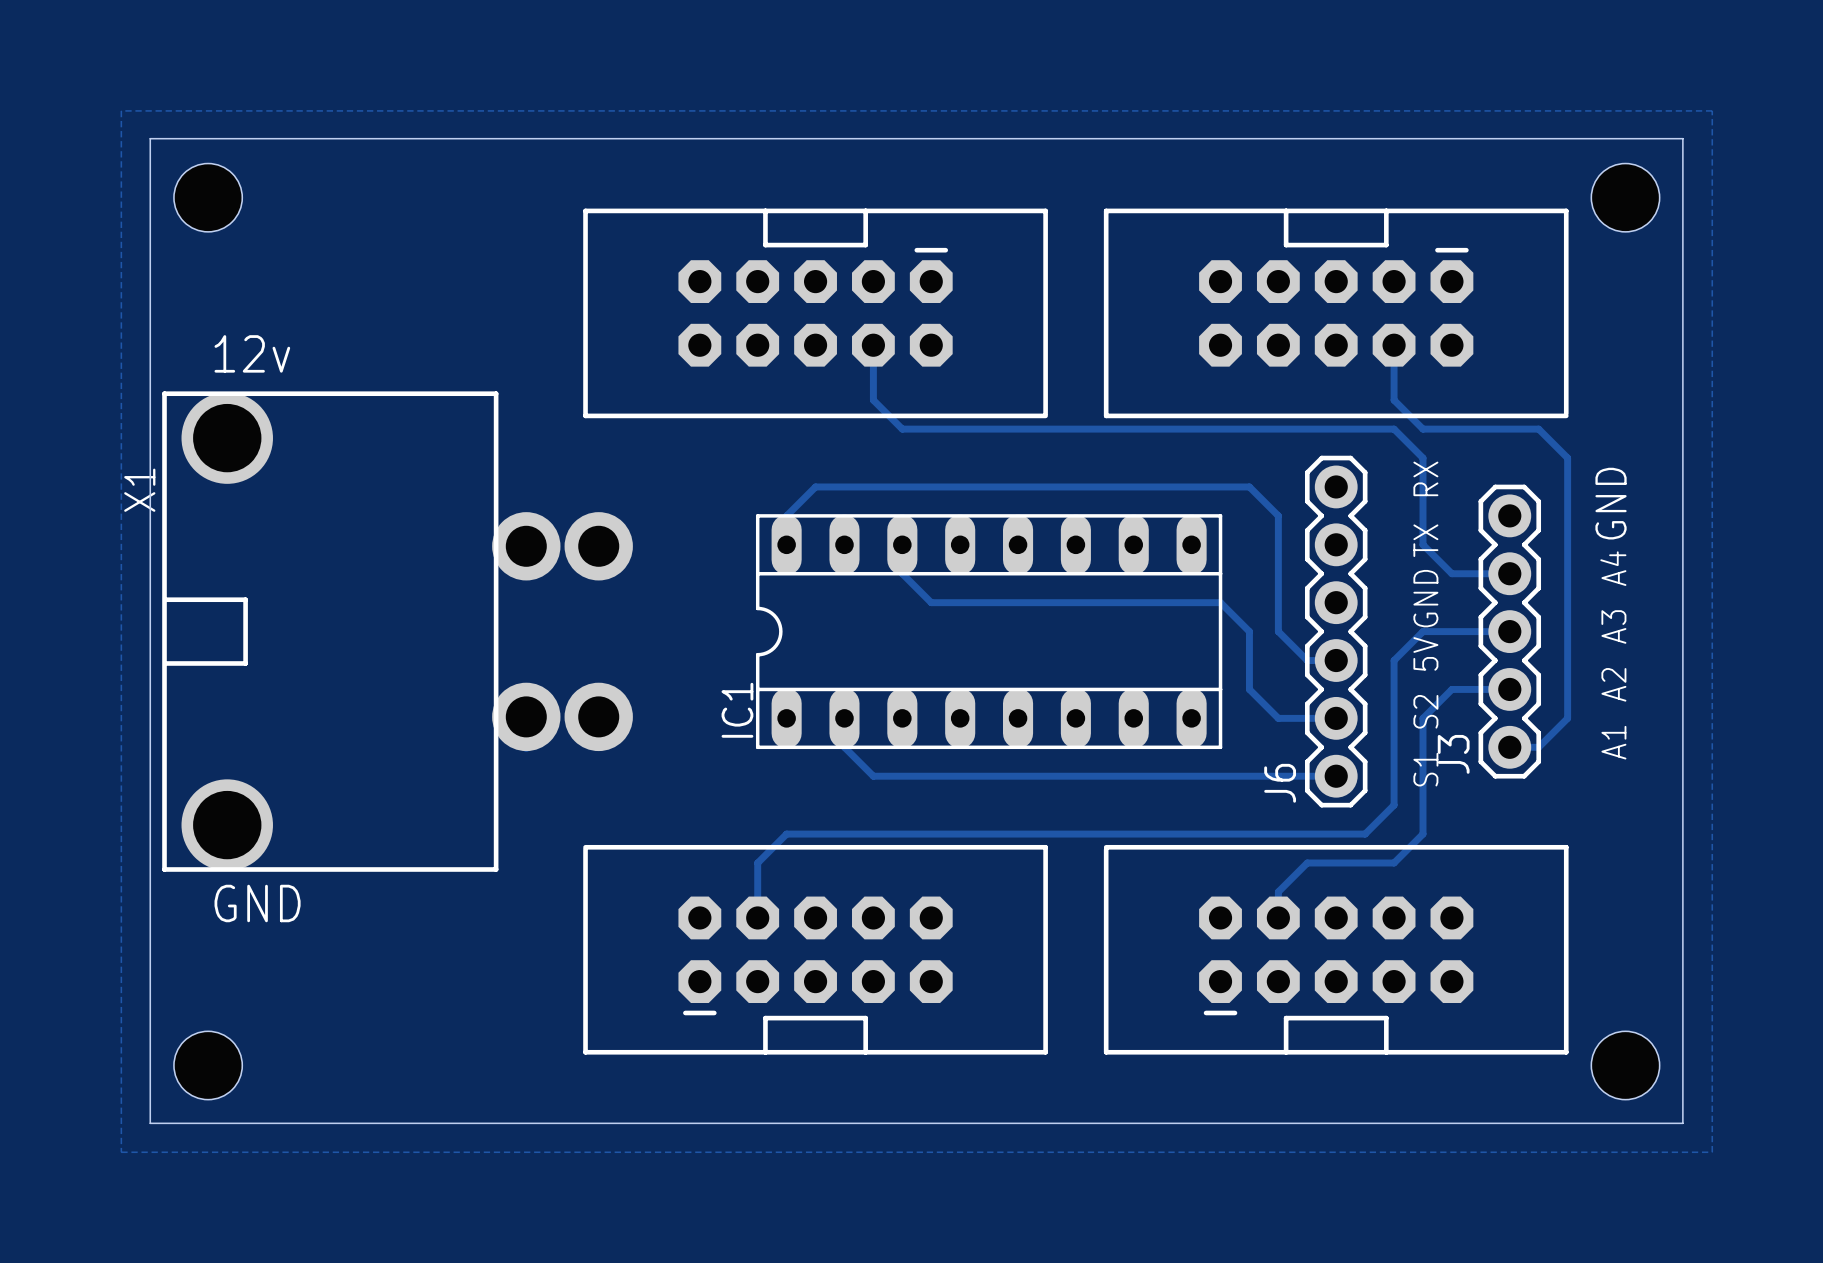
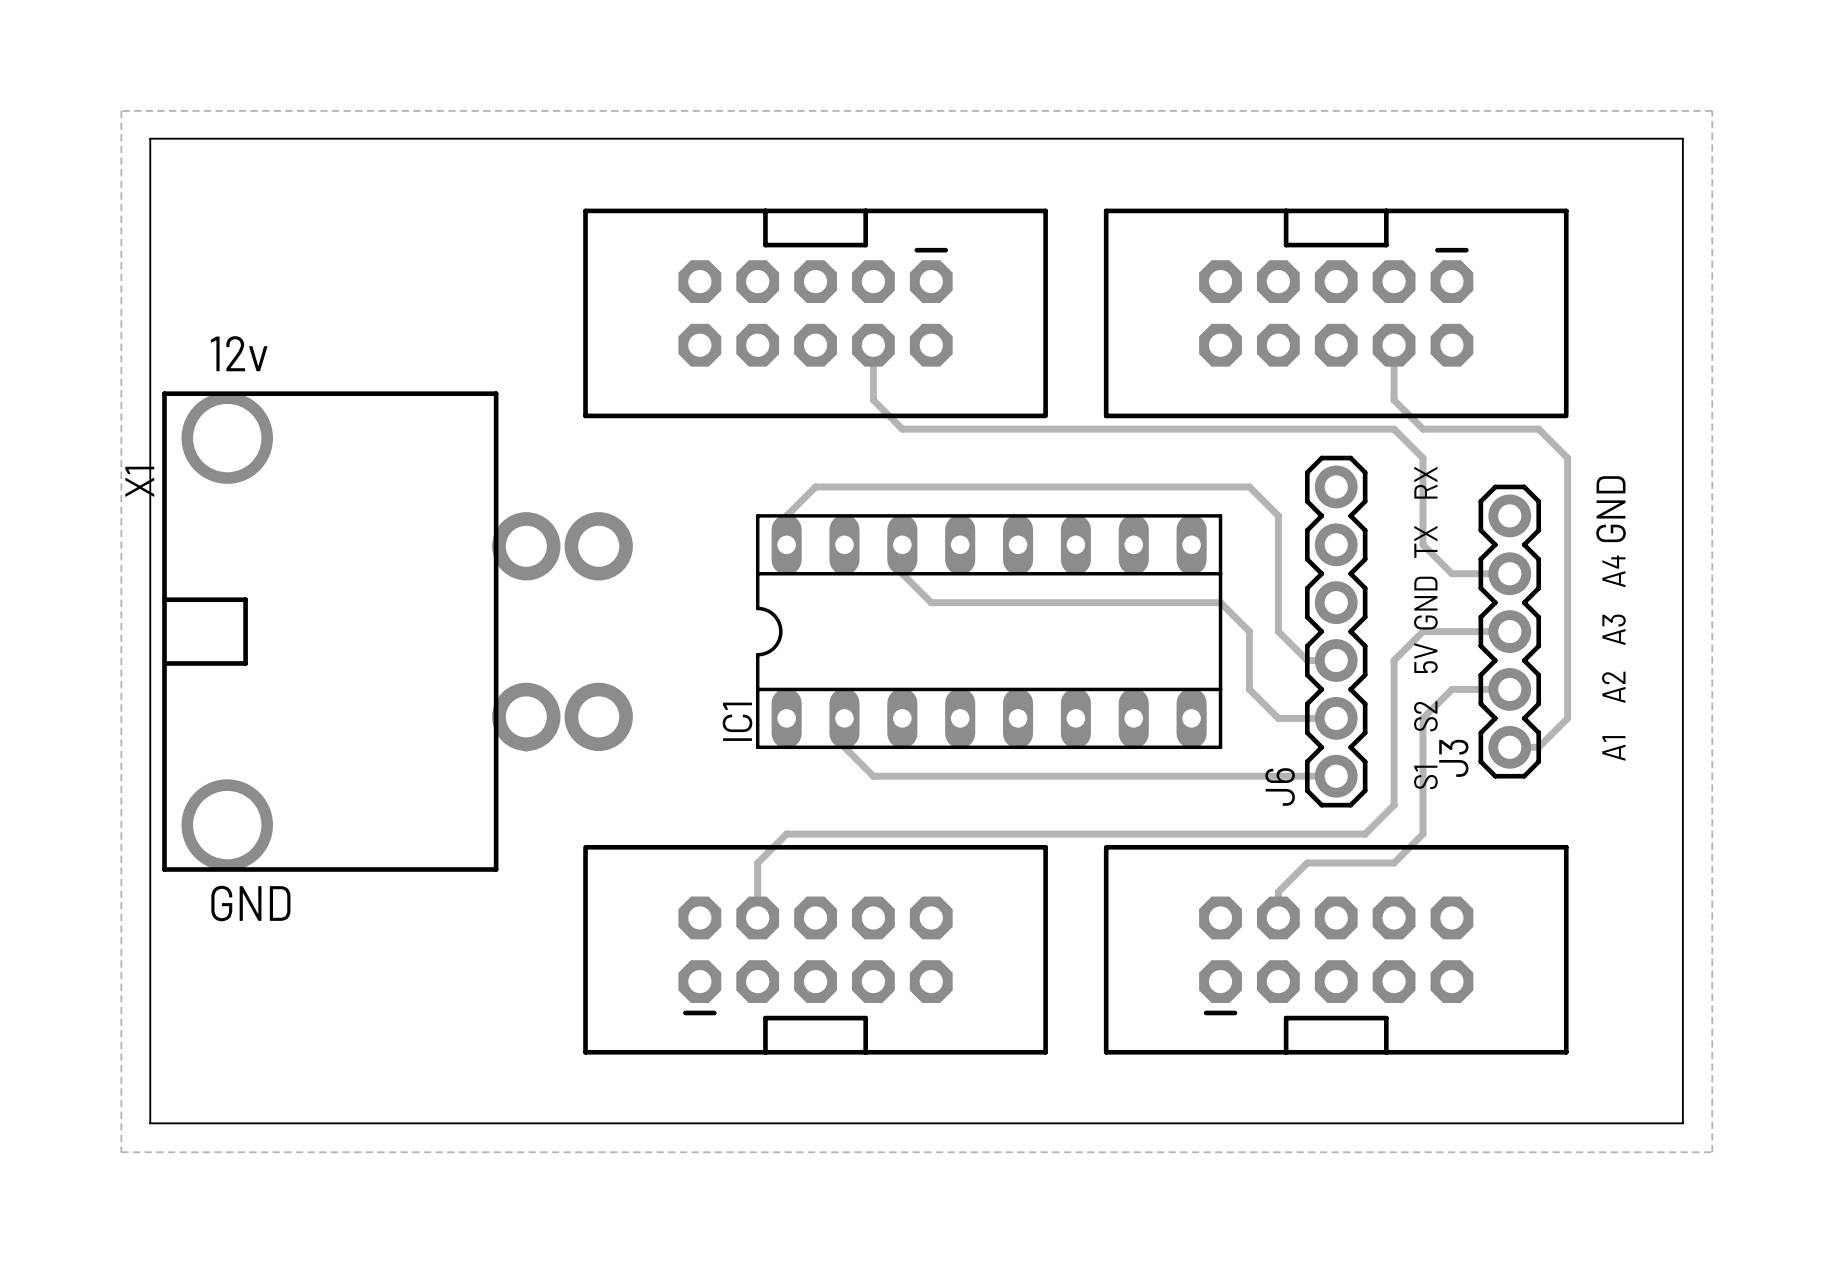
hole: (208, 197) -> none
hole: (1625, 197) -> none
hole: (208, 1065) -> none
hole: (1625, 1065) -> none

